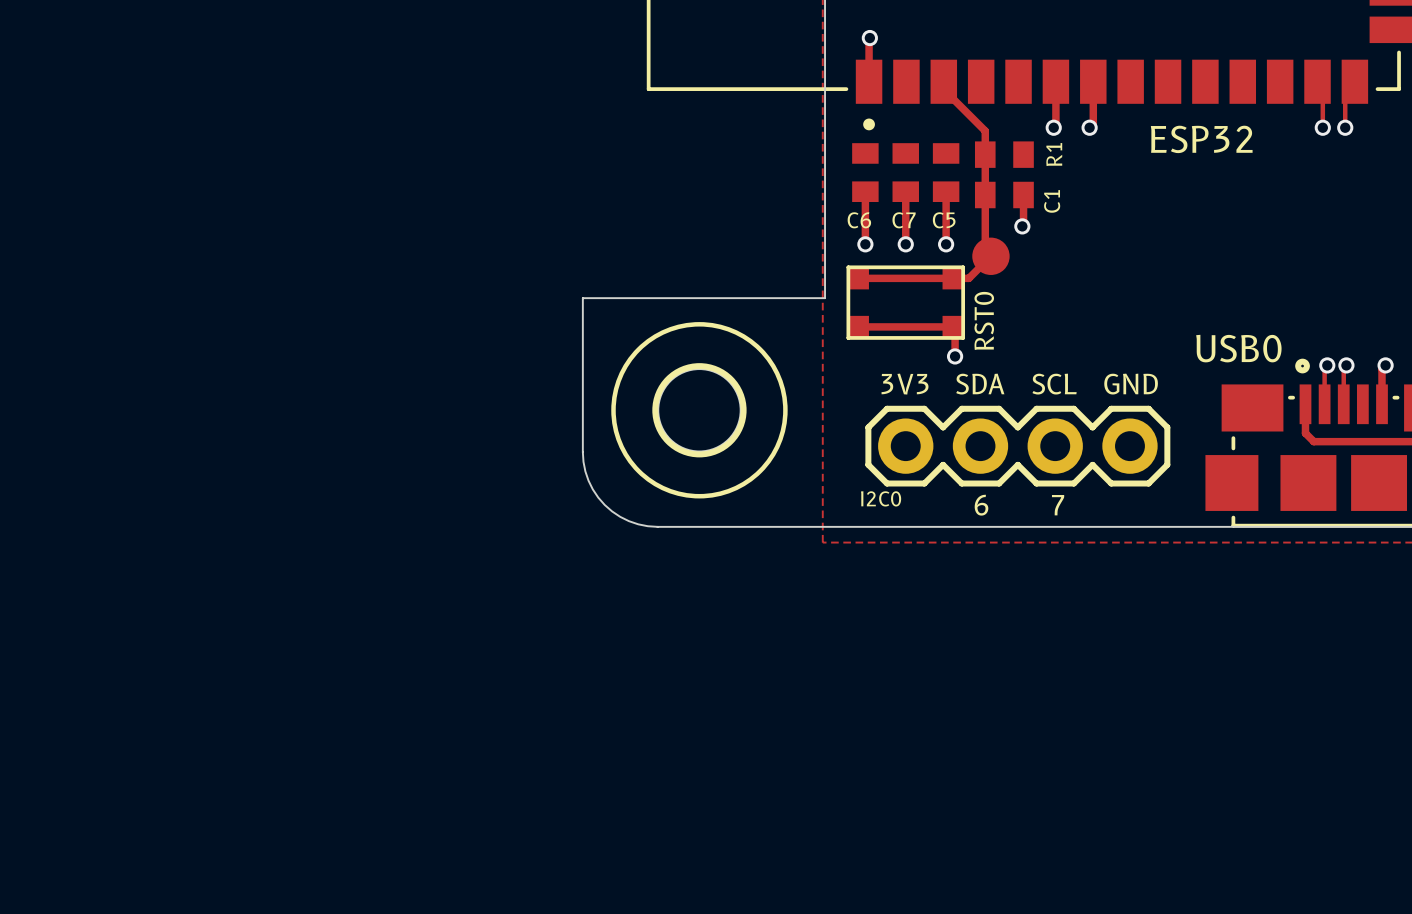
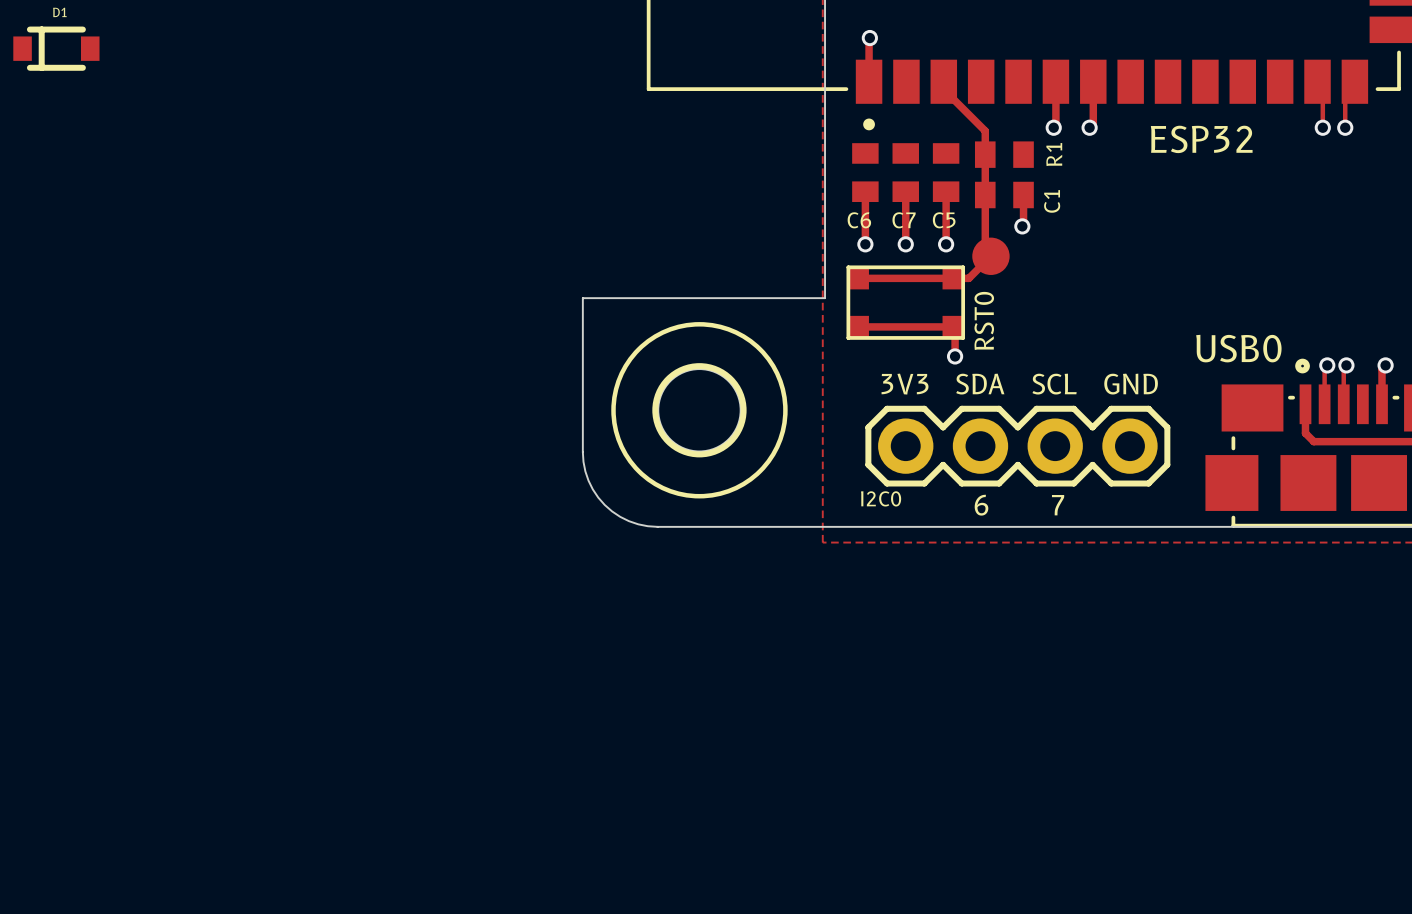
D1: none -> (56, 48)

